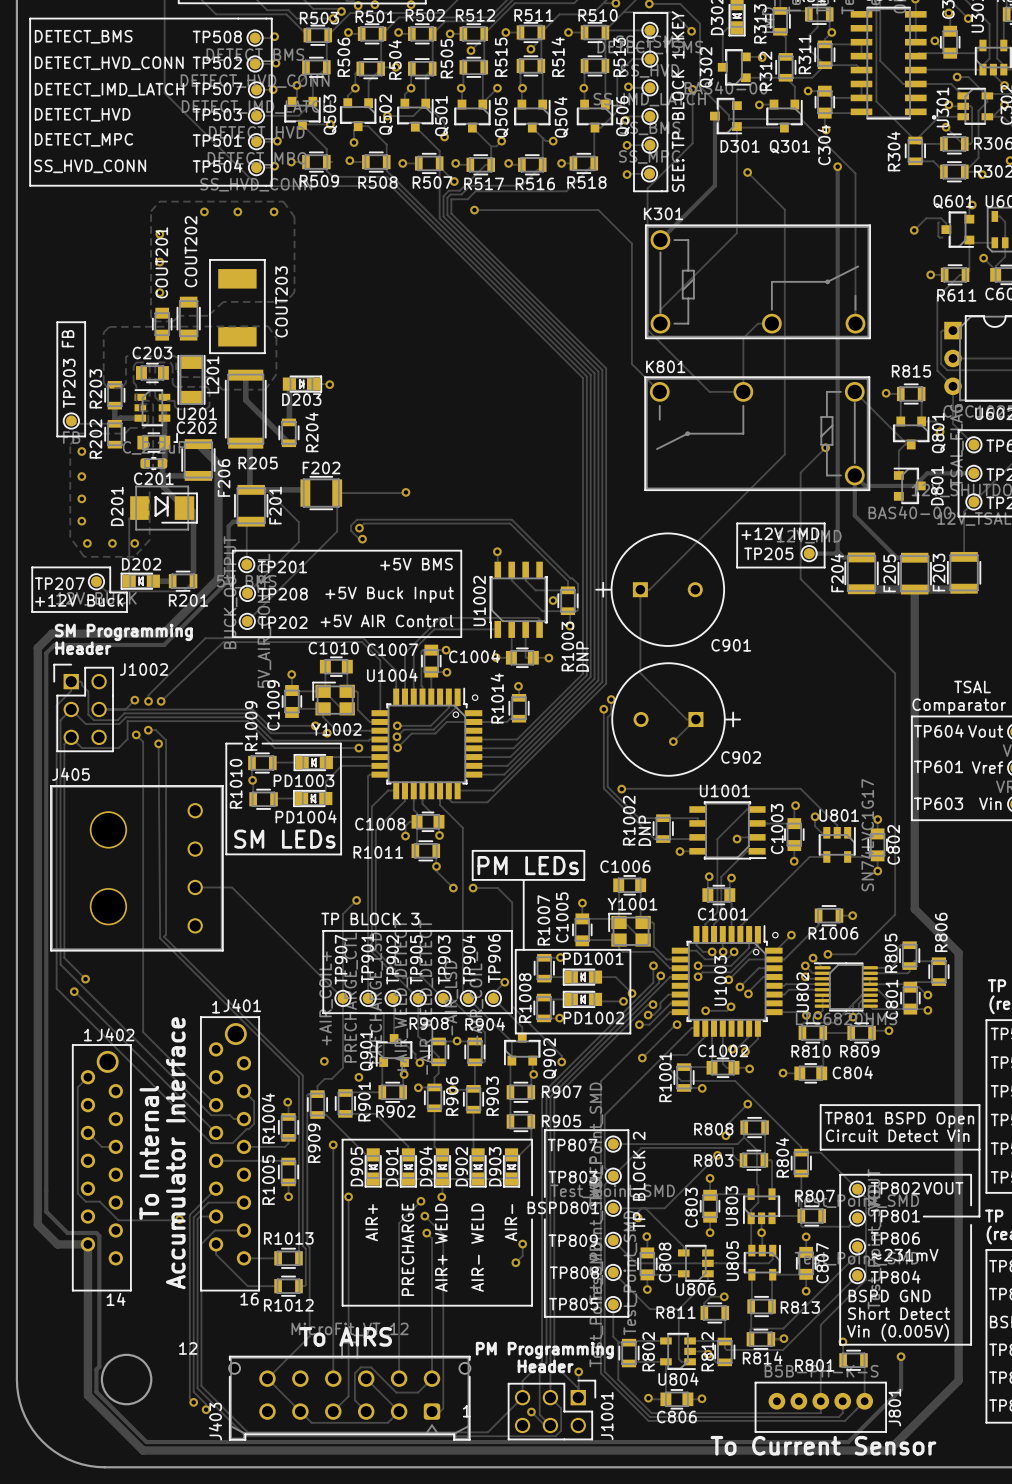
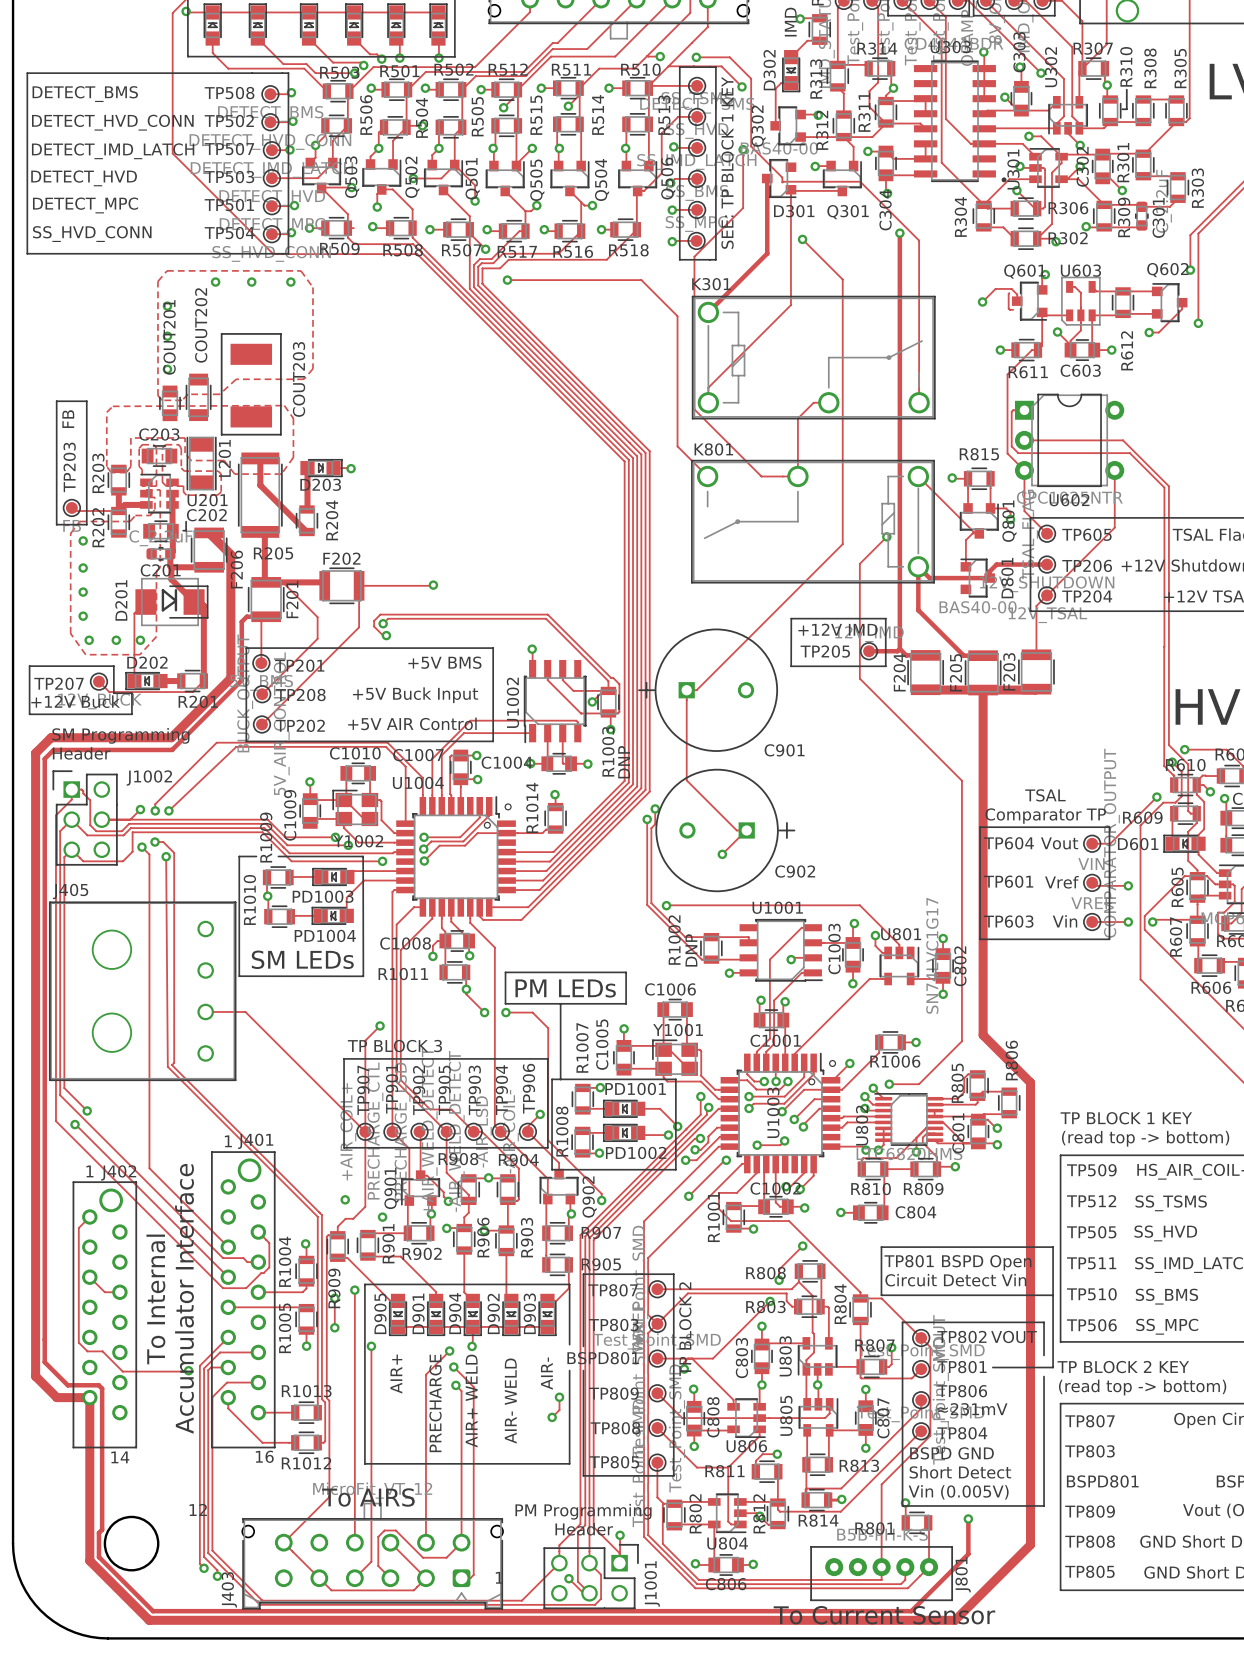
track: none -> (334, 1298) (334, 1327)
via: none -> (334, 1298)
via: none -> (334, 1327)
track: none -> (891, 1347) (891, 1364) (889, 1366) (883, 1366)
via: none -> (891, 1347)
track: none -> (761, 1384) (759, 1387) (759, 1406)

